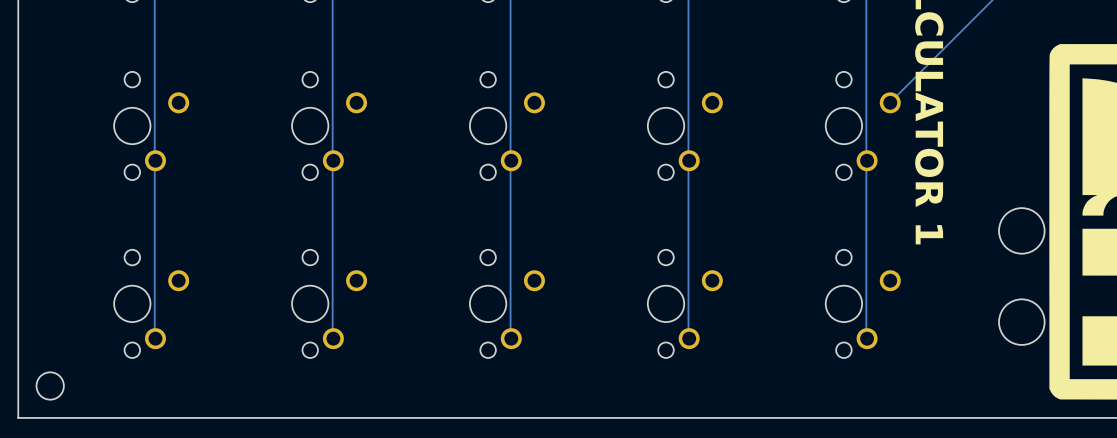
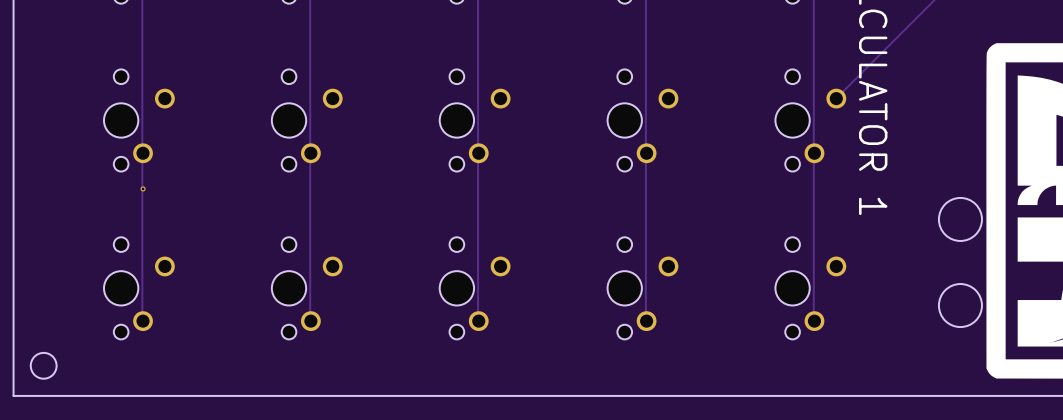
via: none -> (143, 188)

